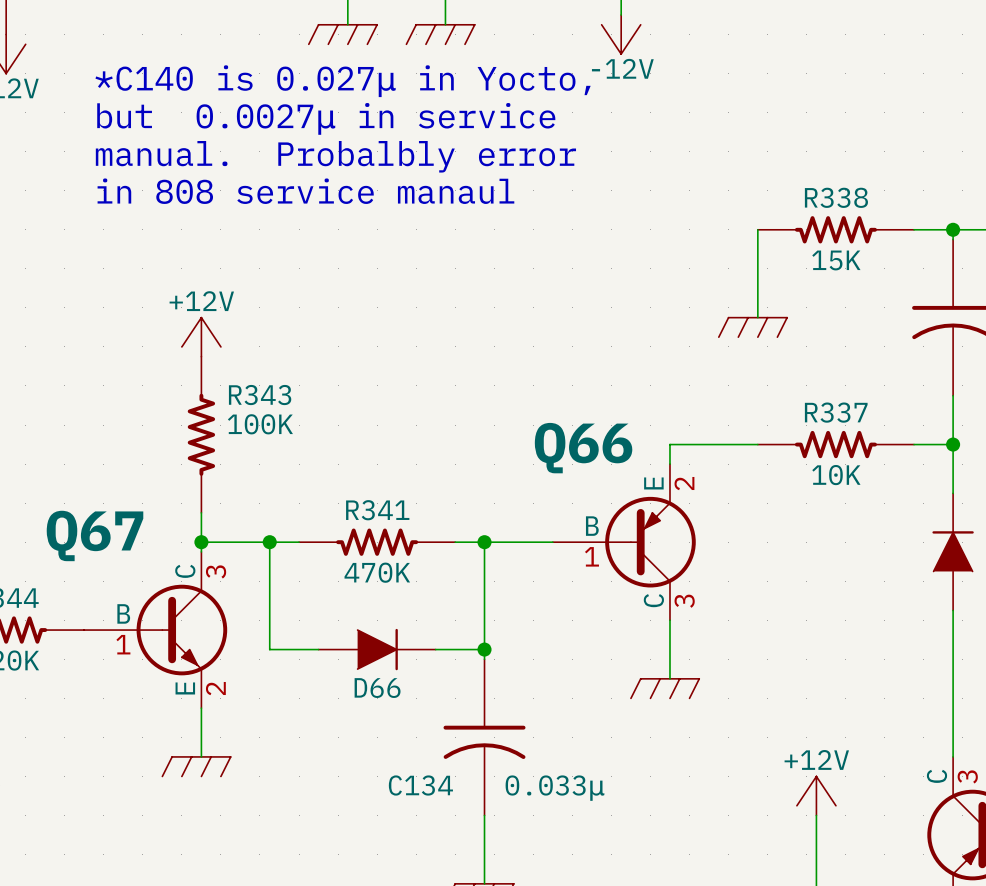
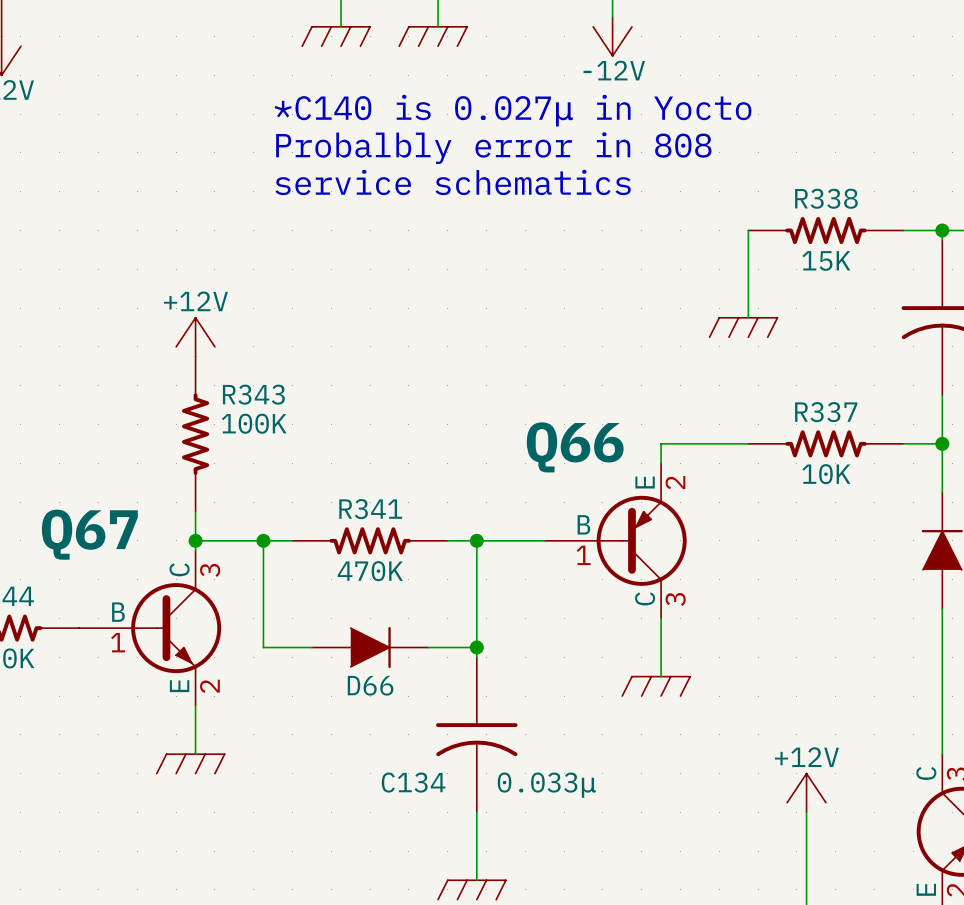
text: *C140 is 0.027μ in Yocto, (343, 81) -> *C140 is 0.027μ in Yocto (513, 110)
text: but 0.0027μ in service (326, 118) -> none
text: manual. Probalbly error (335, 156) -> Probalbly error in 808 (493, 148)
text: none -> service schematics (453, 182)
text: in 808 service manaul (305, 191) -> none

